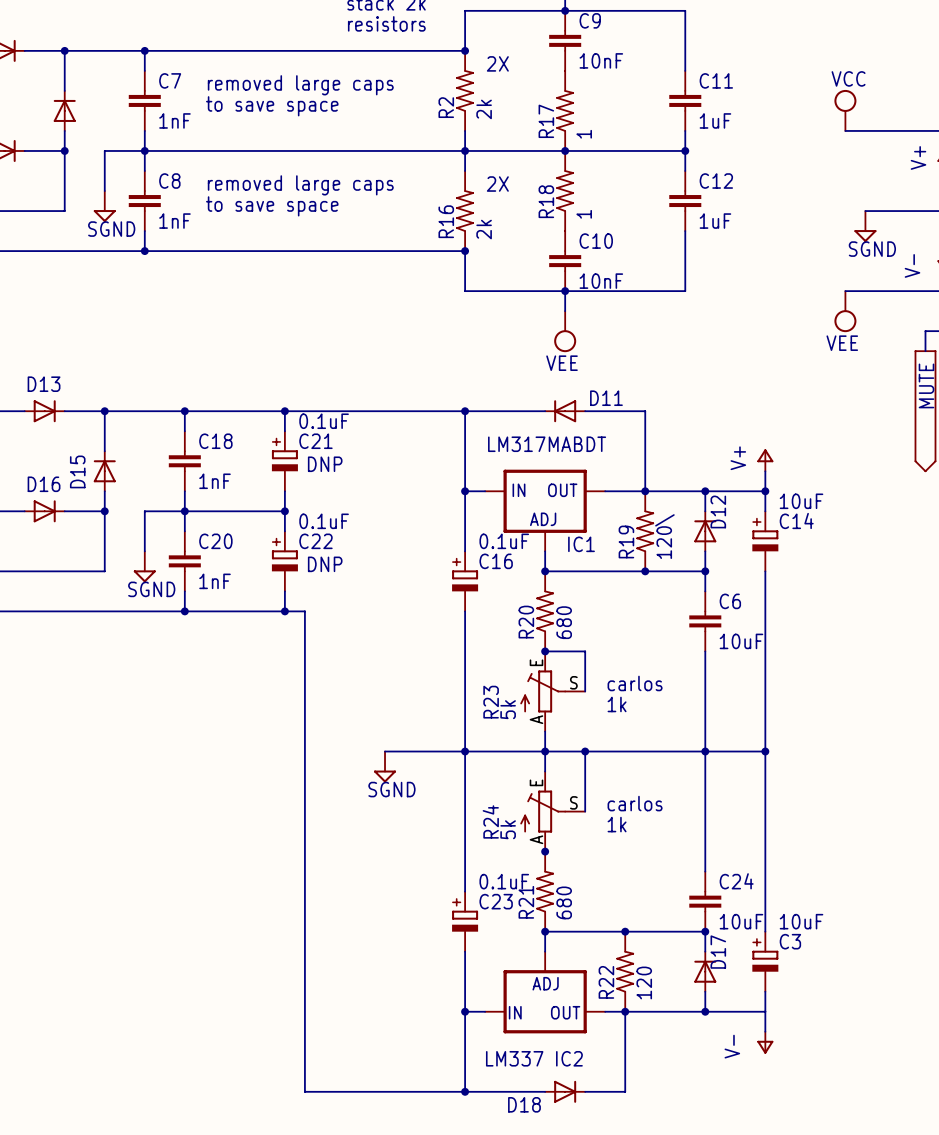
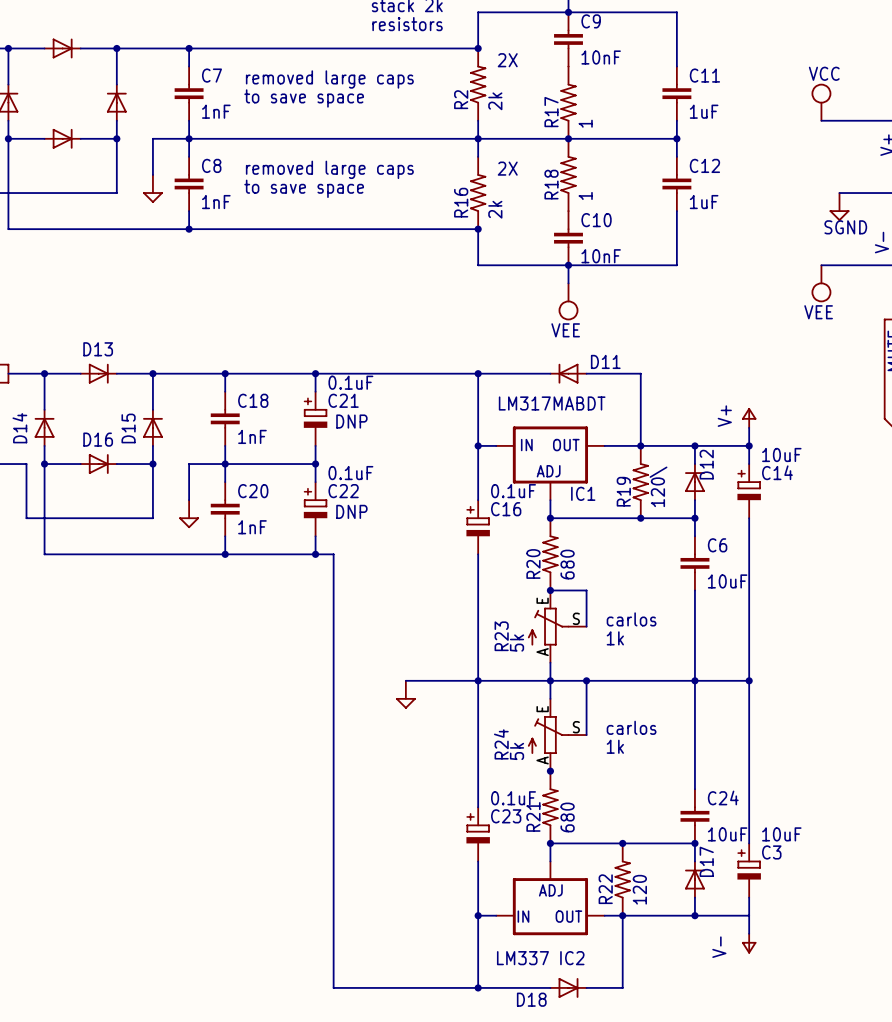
power symbol text: SGND (111, 229) -> none
power symbol text: SGND (151, 589) -> none
power symbol text: SGND (391, 789) -> none

